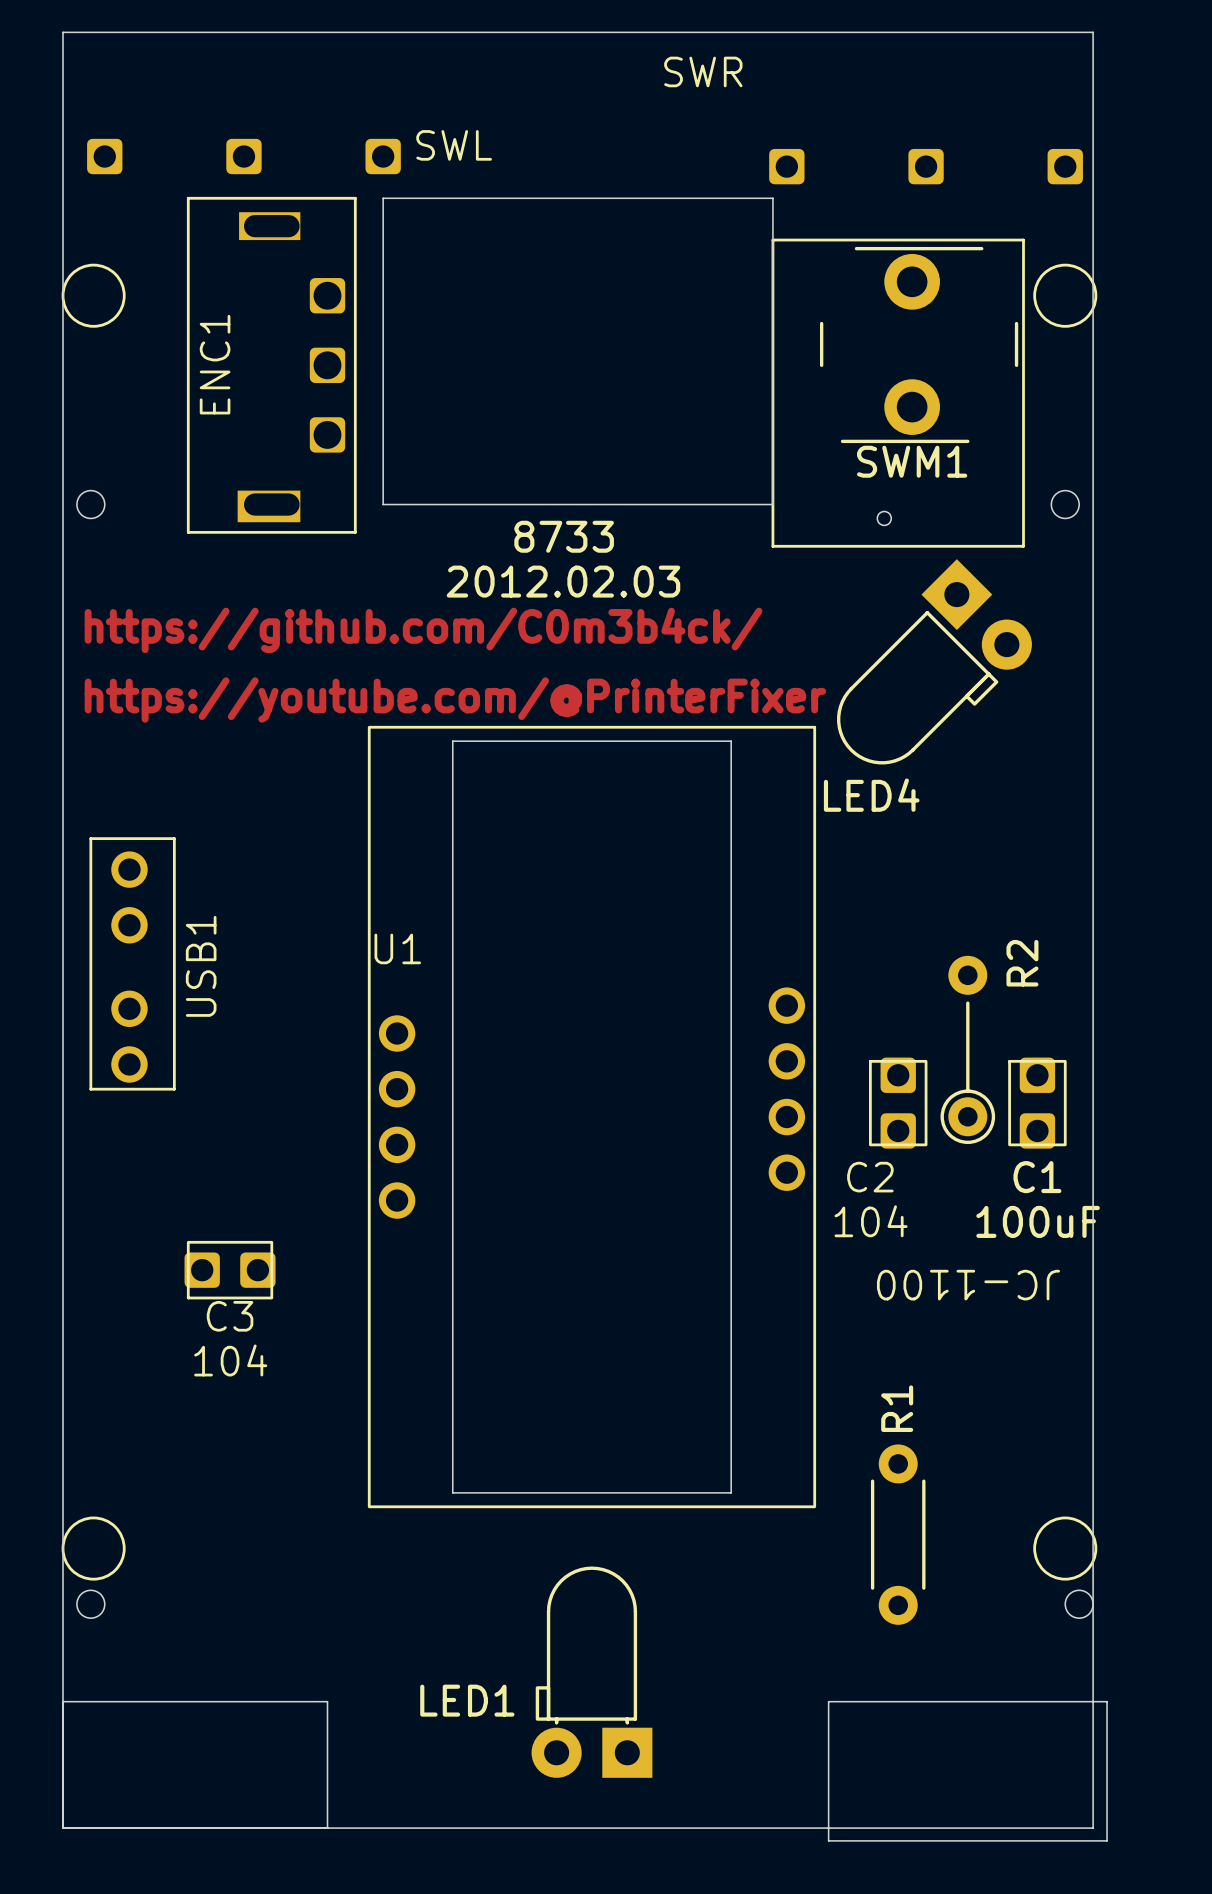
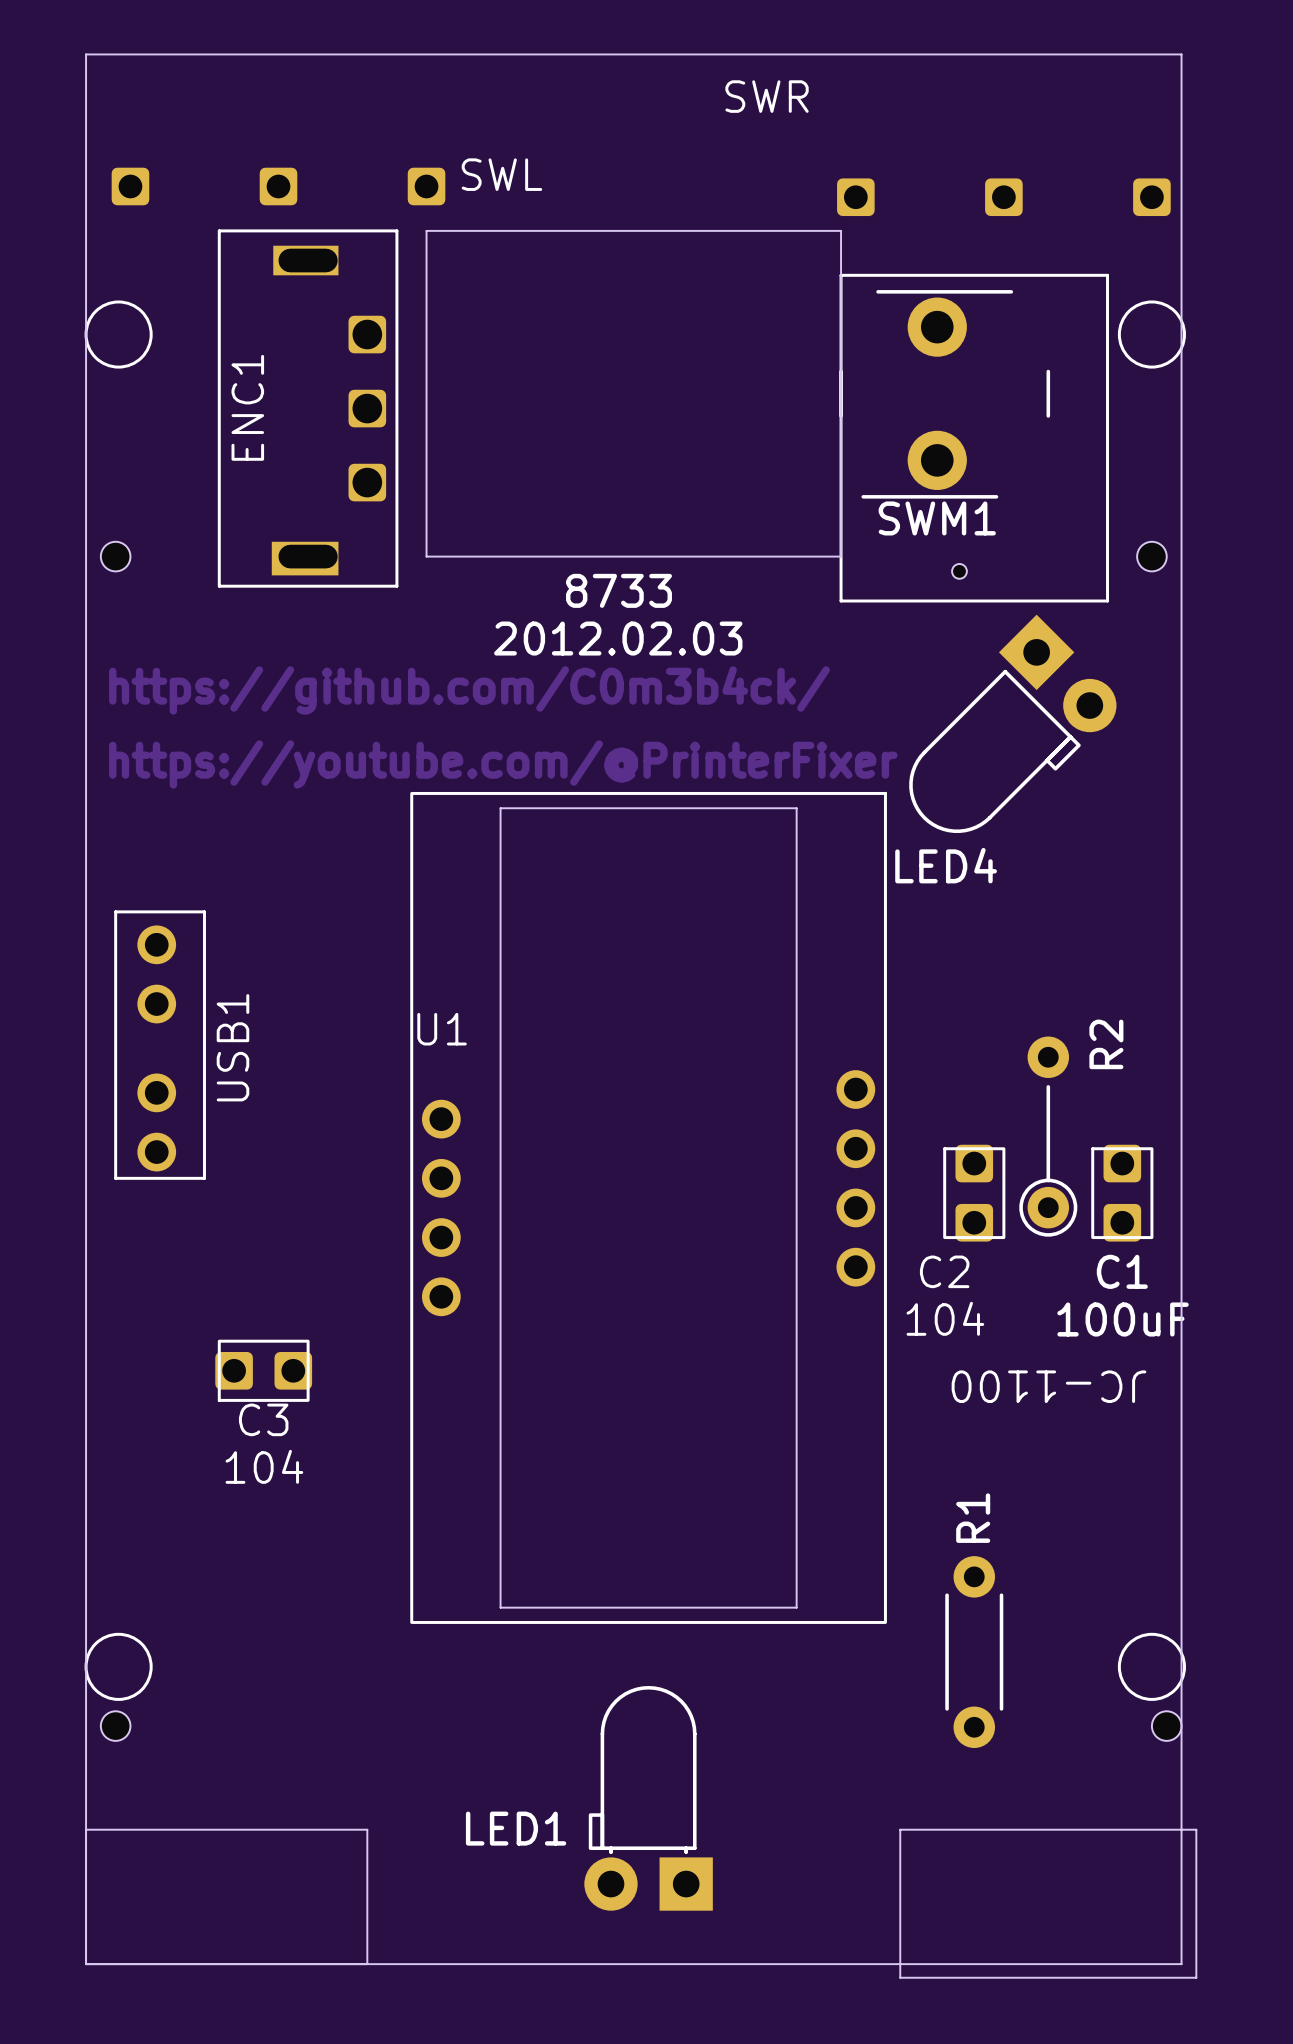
SWM1 position: (919, 345) -> (944, 394)

